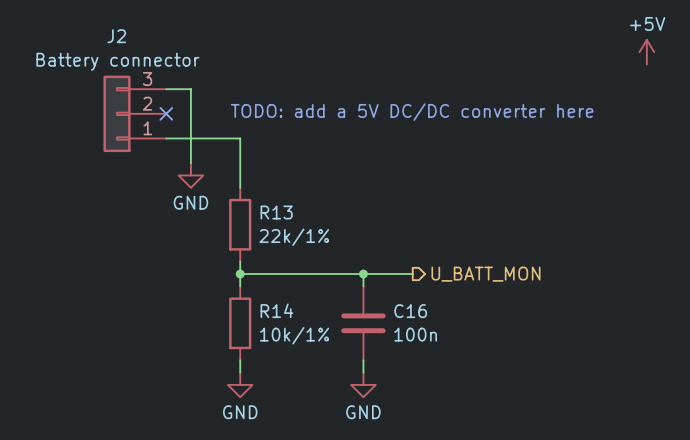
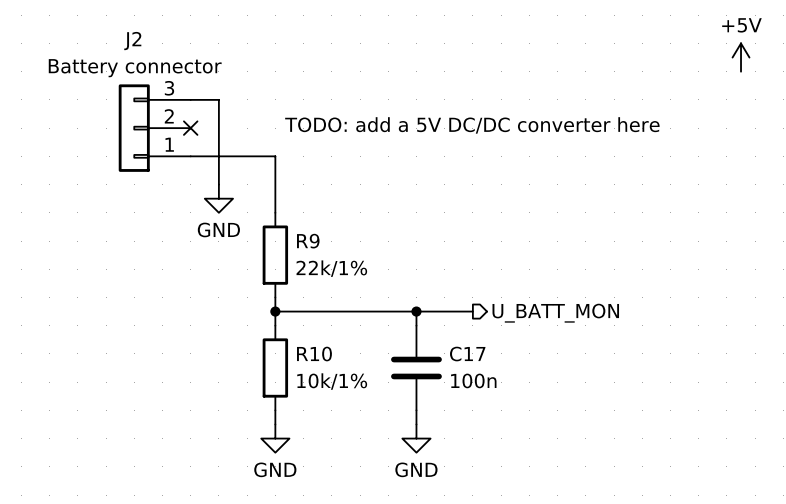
R13 name: R13 (276, 212) -> R9 (308, 241)
R14 name: R14 (276, 310) -> R10 (314, 354)
C16 name: C16 (410, 311) -> C17 (467, 354)

